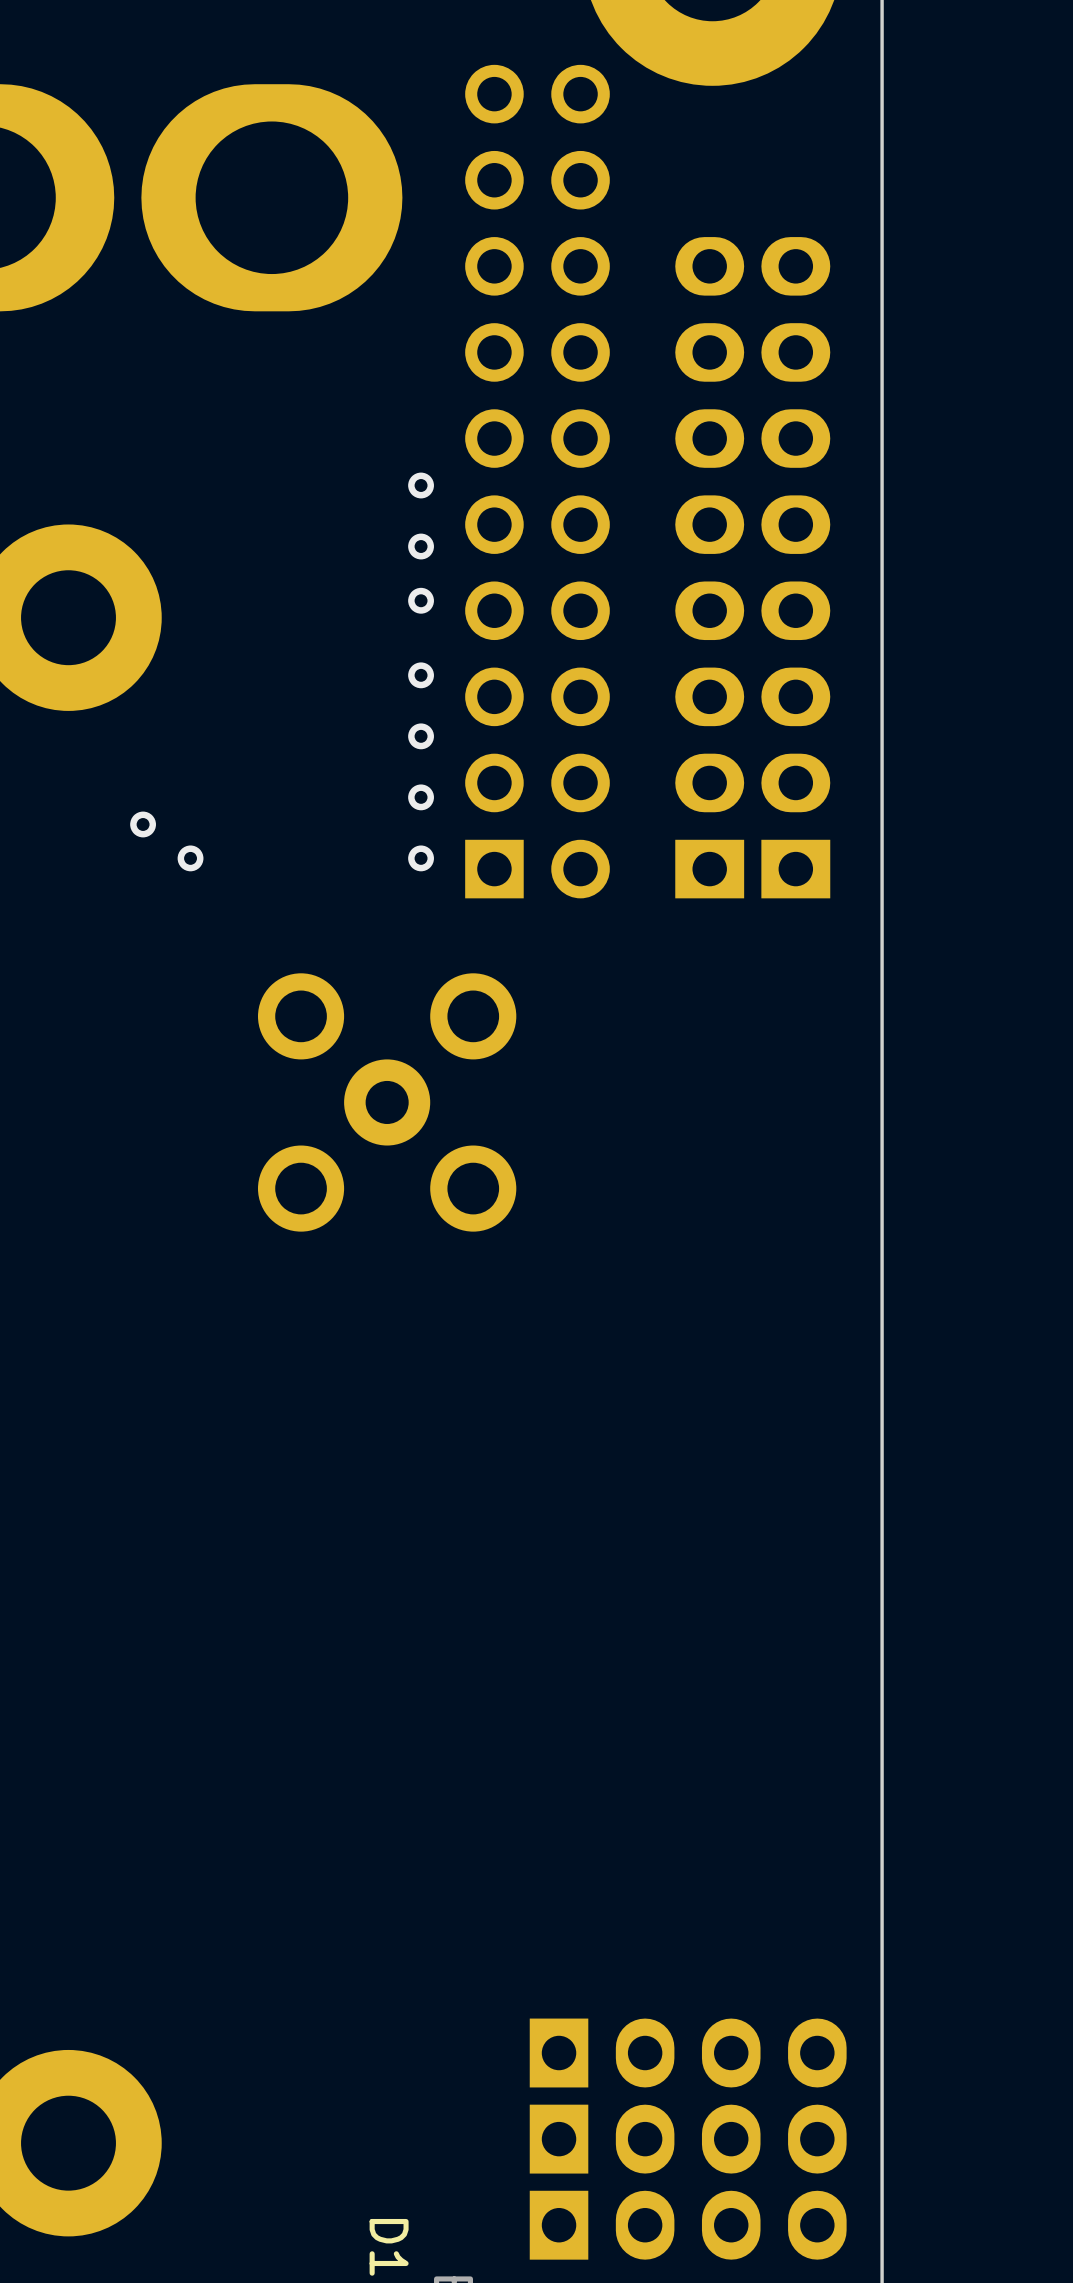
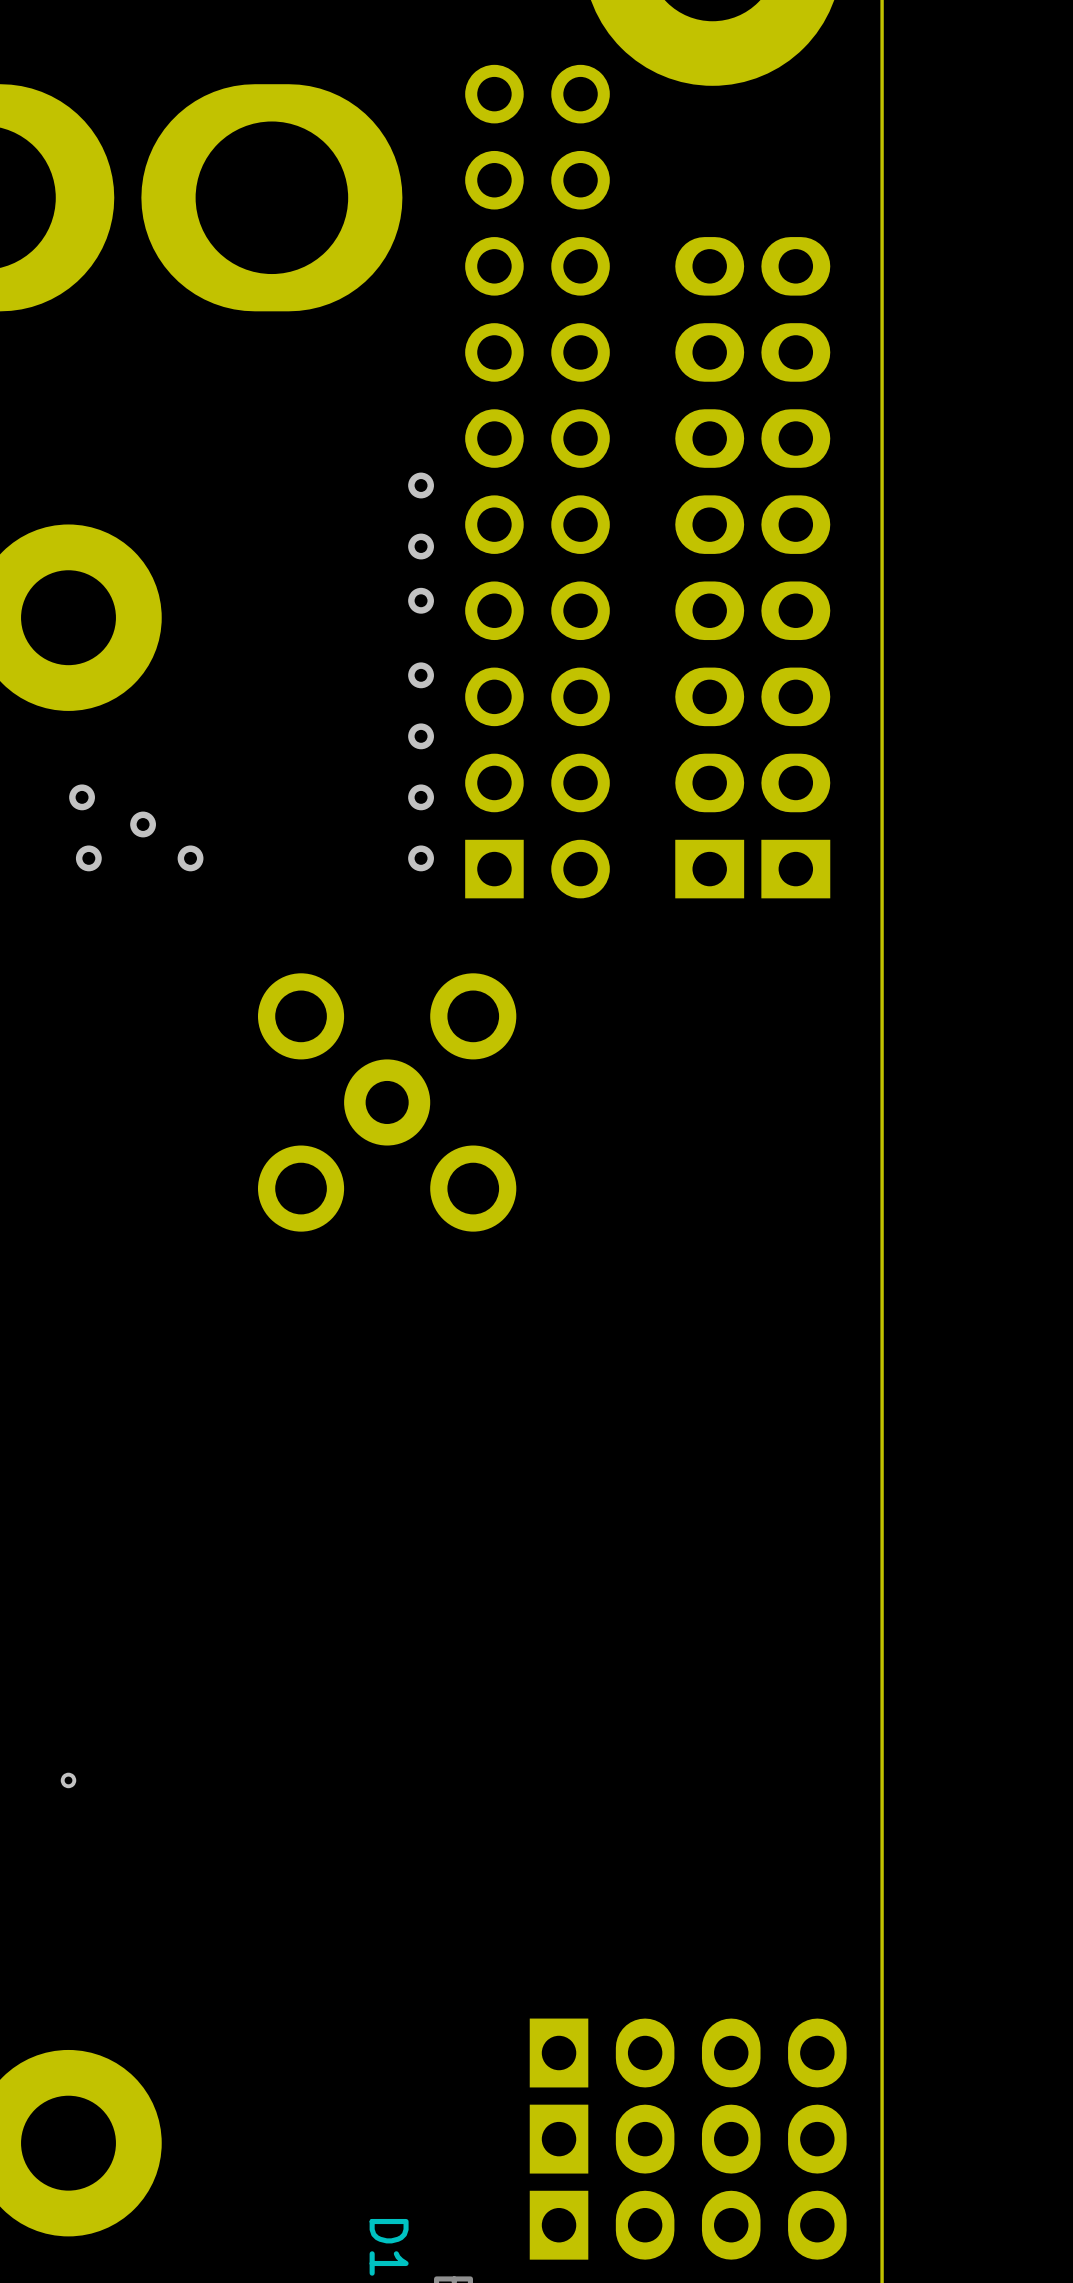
via: none -> (82, 797)
via: none -> (88, 858)
via: none -> (68, 1780)

